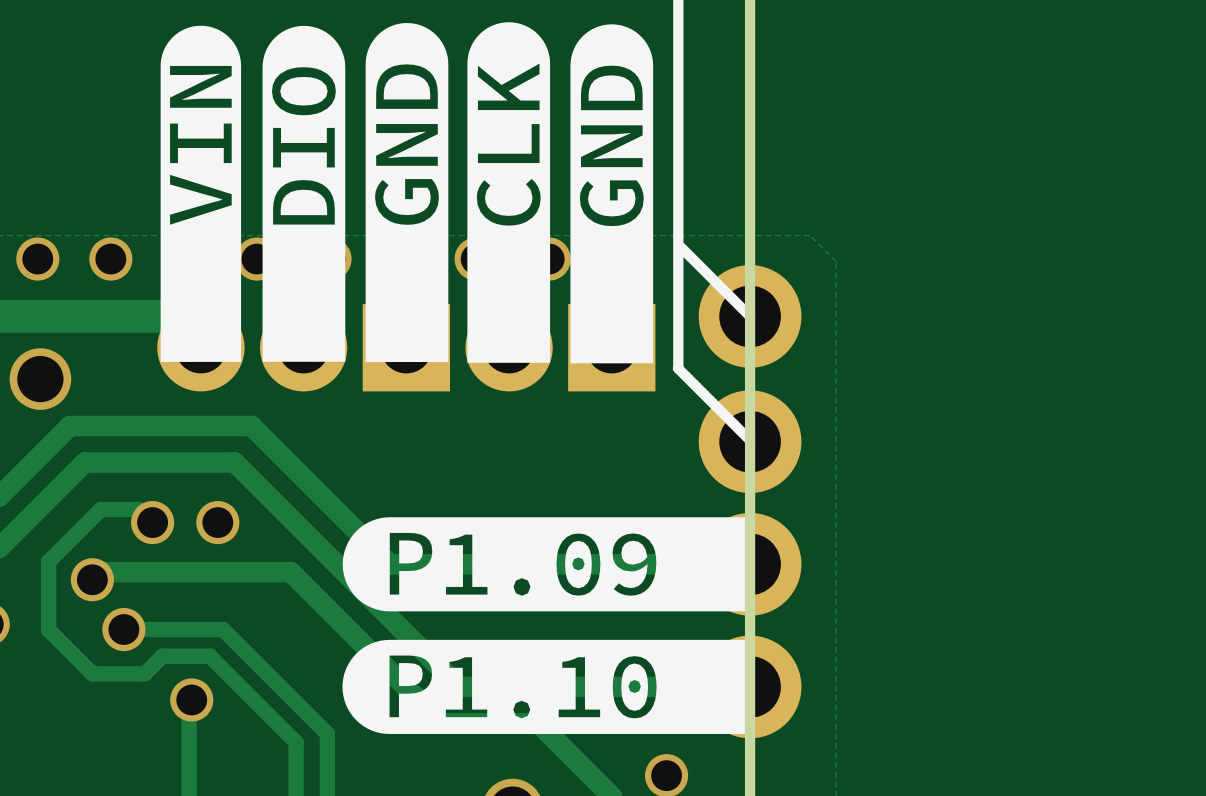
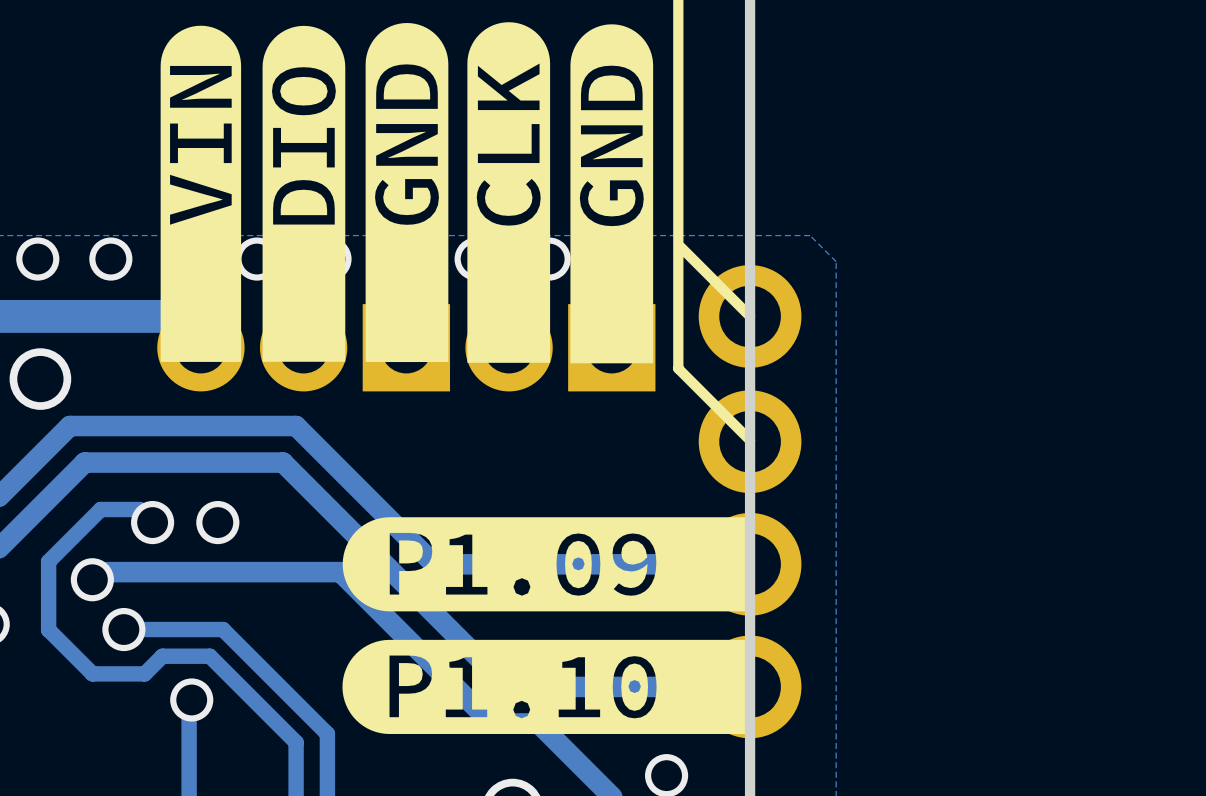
track: (251, 426) (390, 564) (434, 564) -> (251, 426) (296, 426) (434, 564)
track: (234, 462) (459, 686) (507, 686) -> (234, 462) (283, 462) (507, 686)
track: (290, 572) (442, 723) (491, 723) -> (290, 572) (340, 572) (491, 723)

